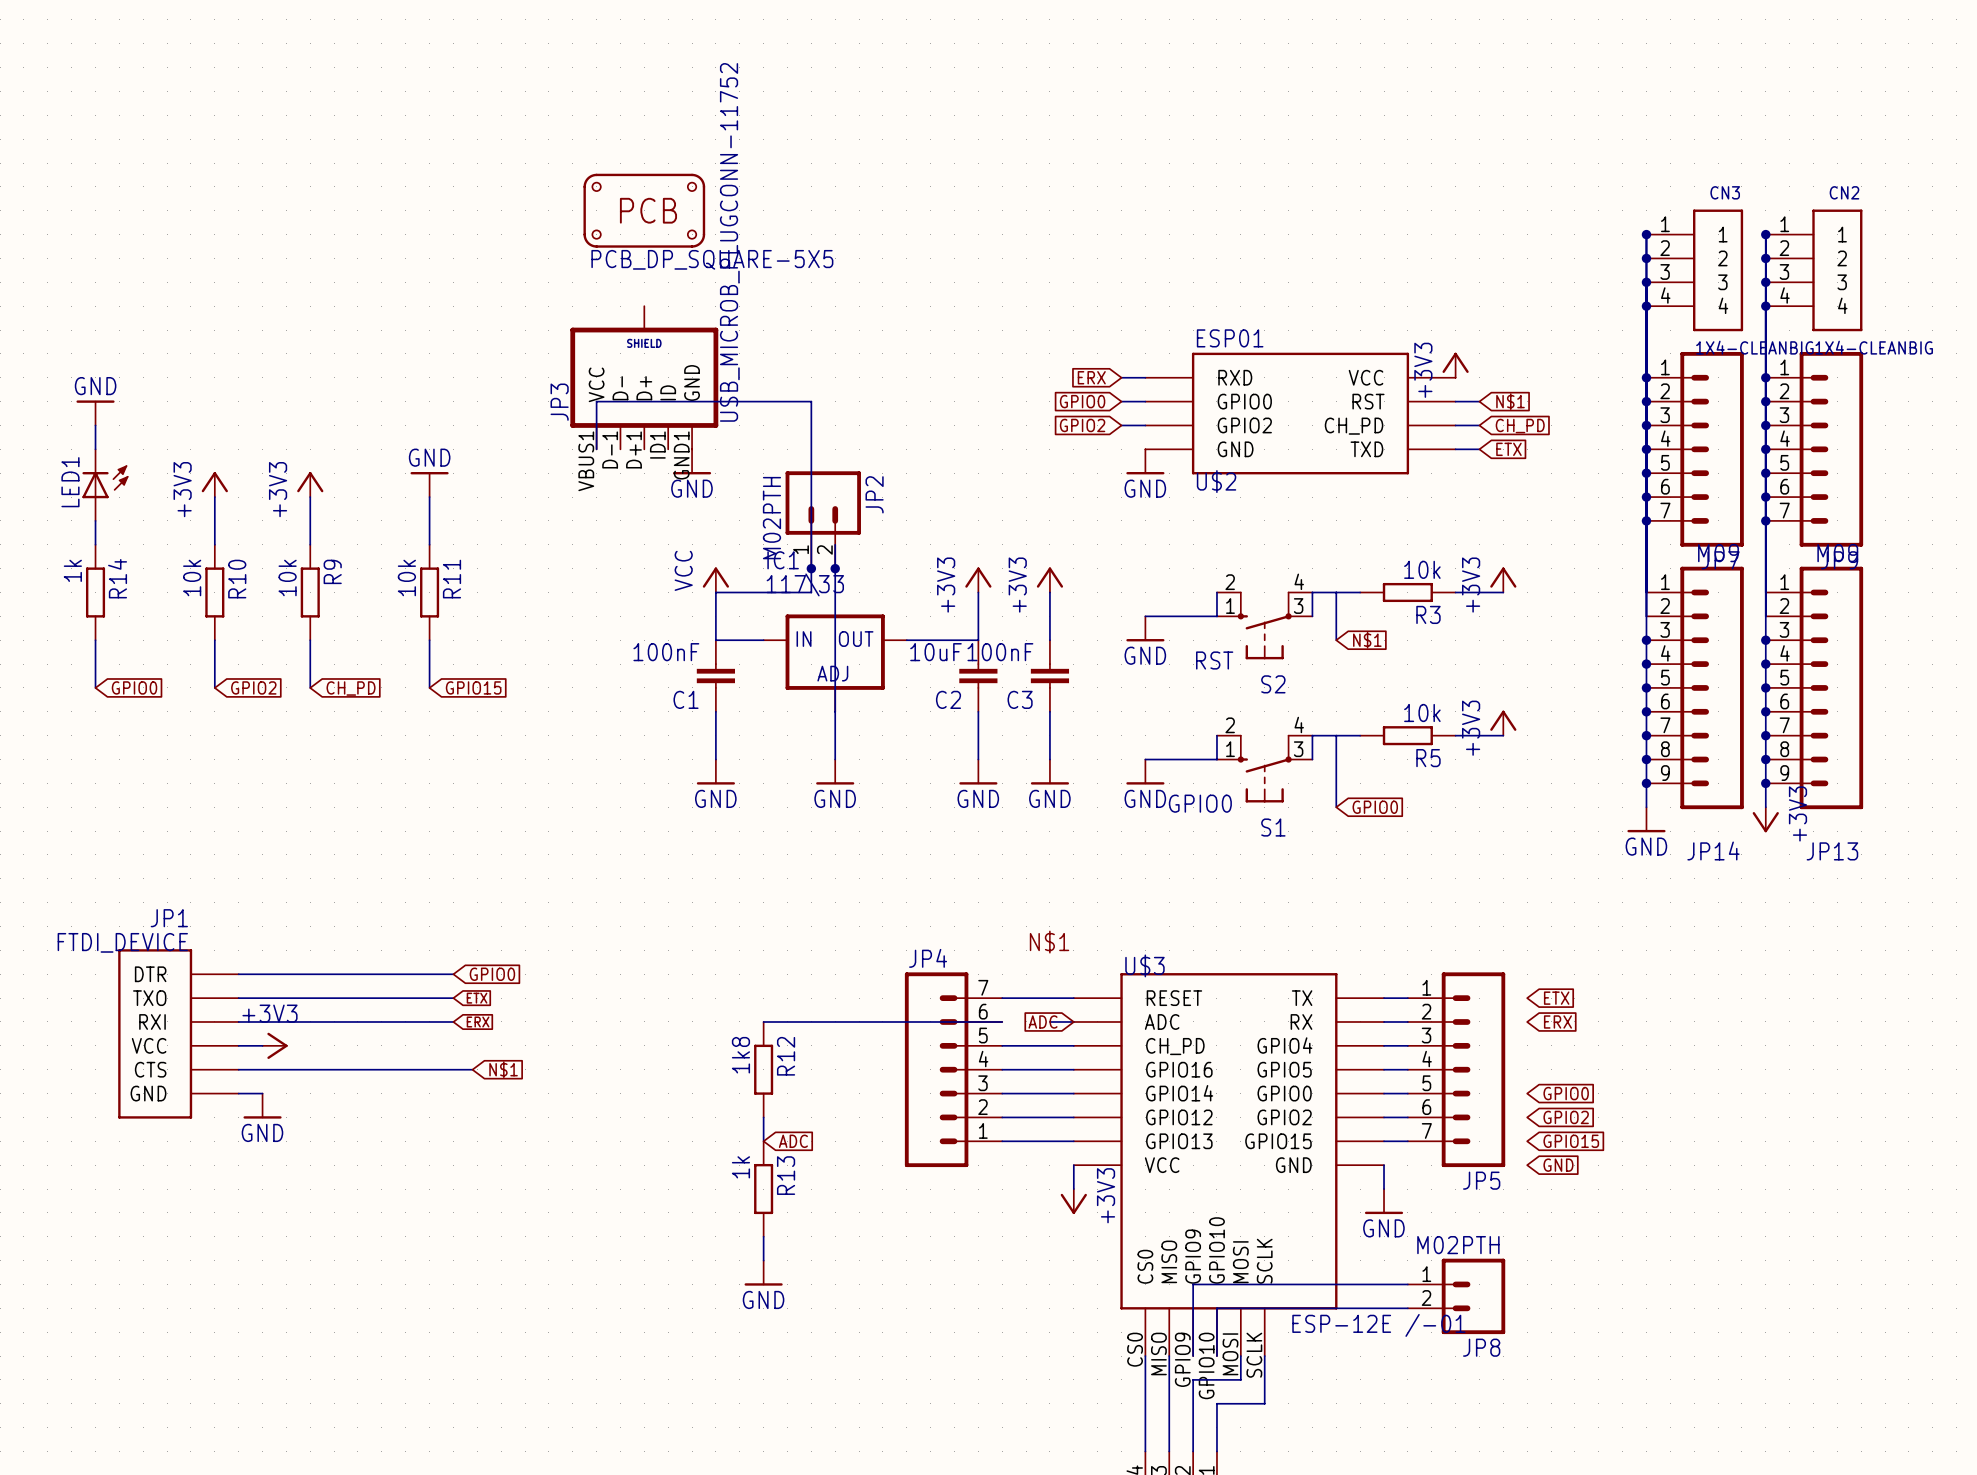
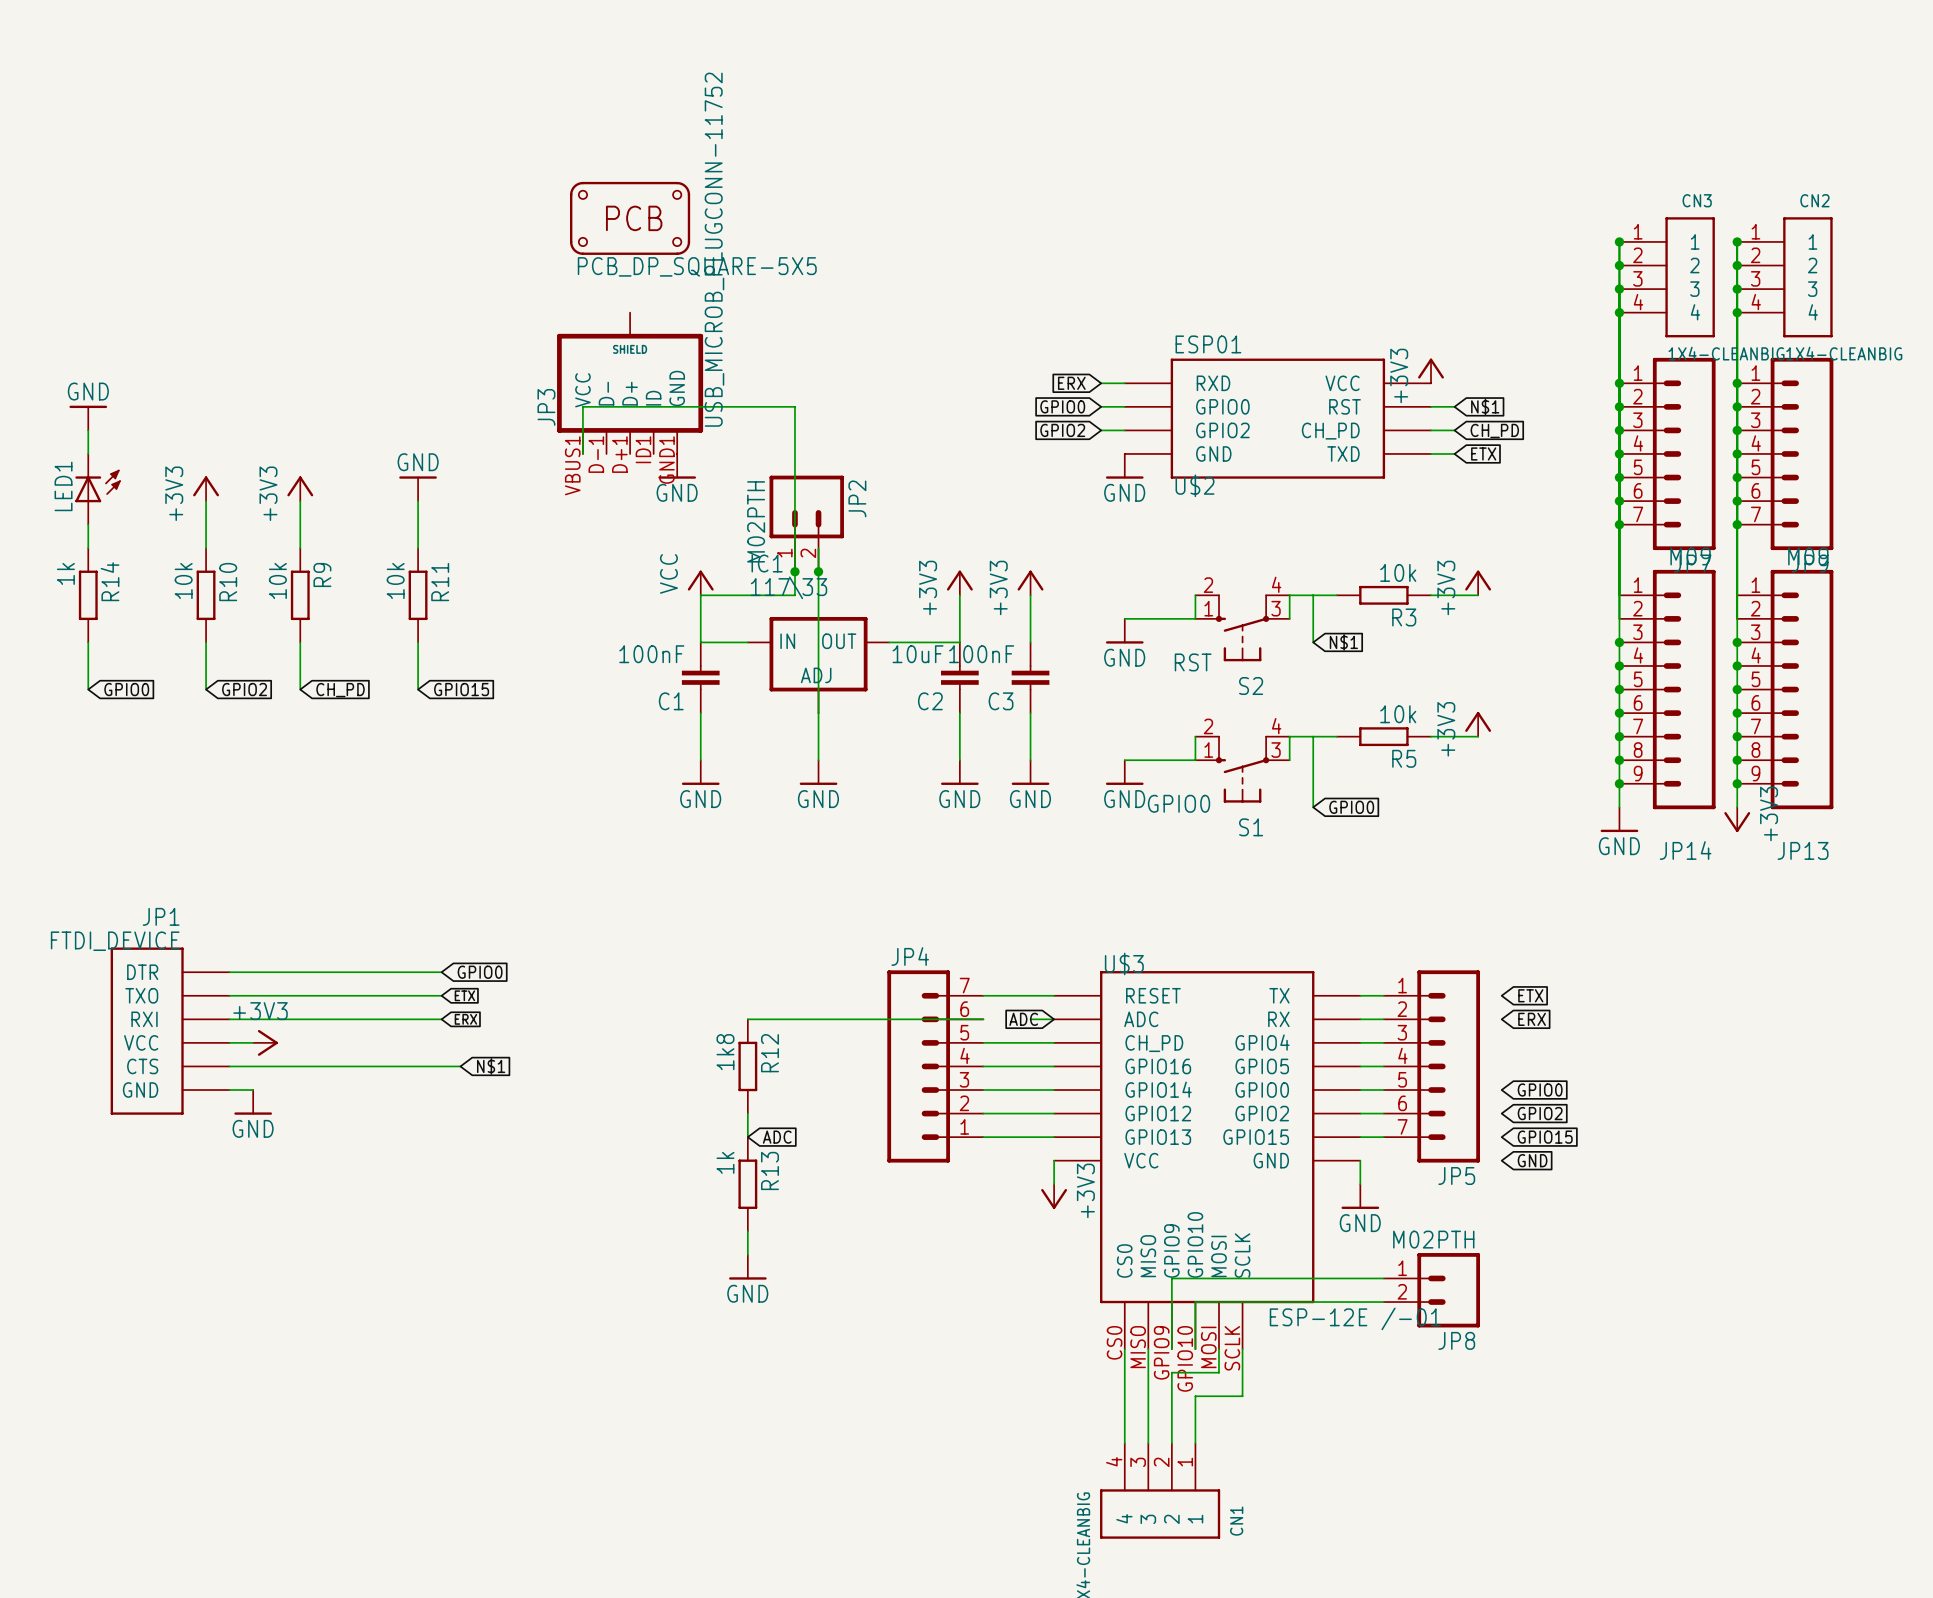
label: N$1 (1049, 942) -> none

